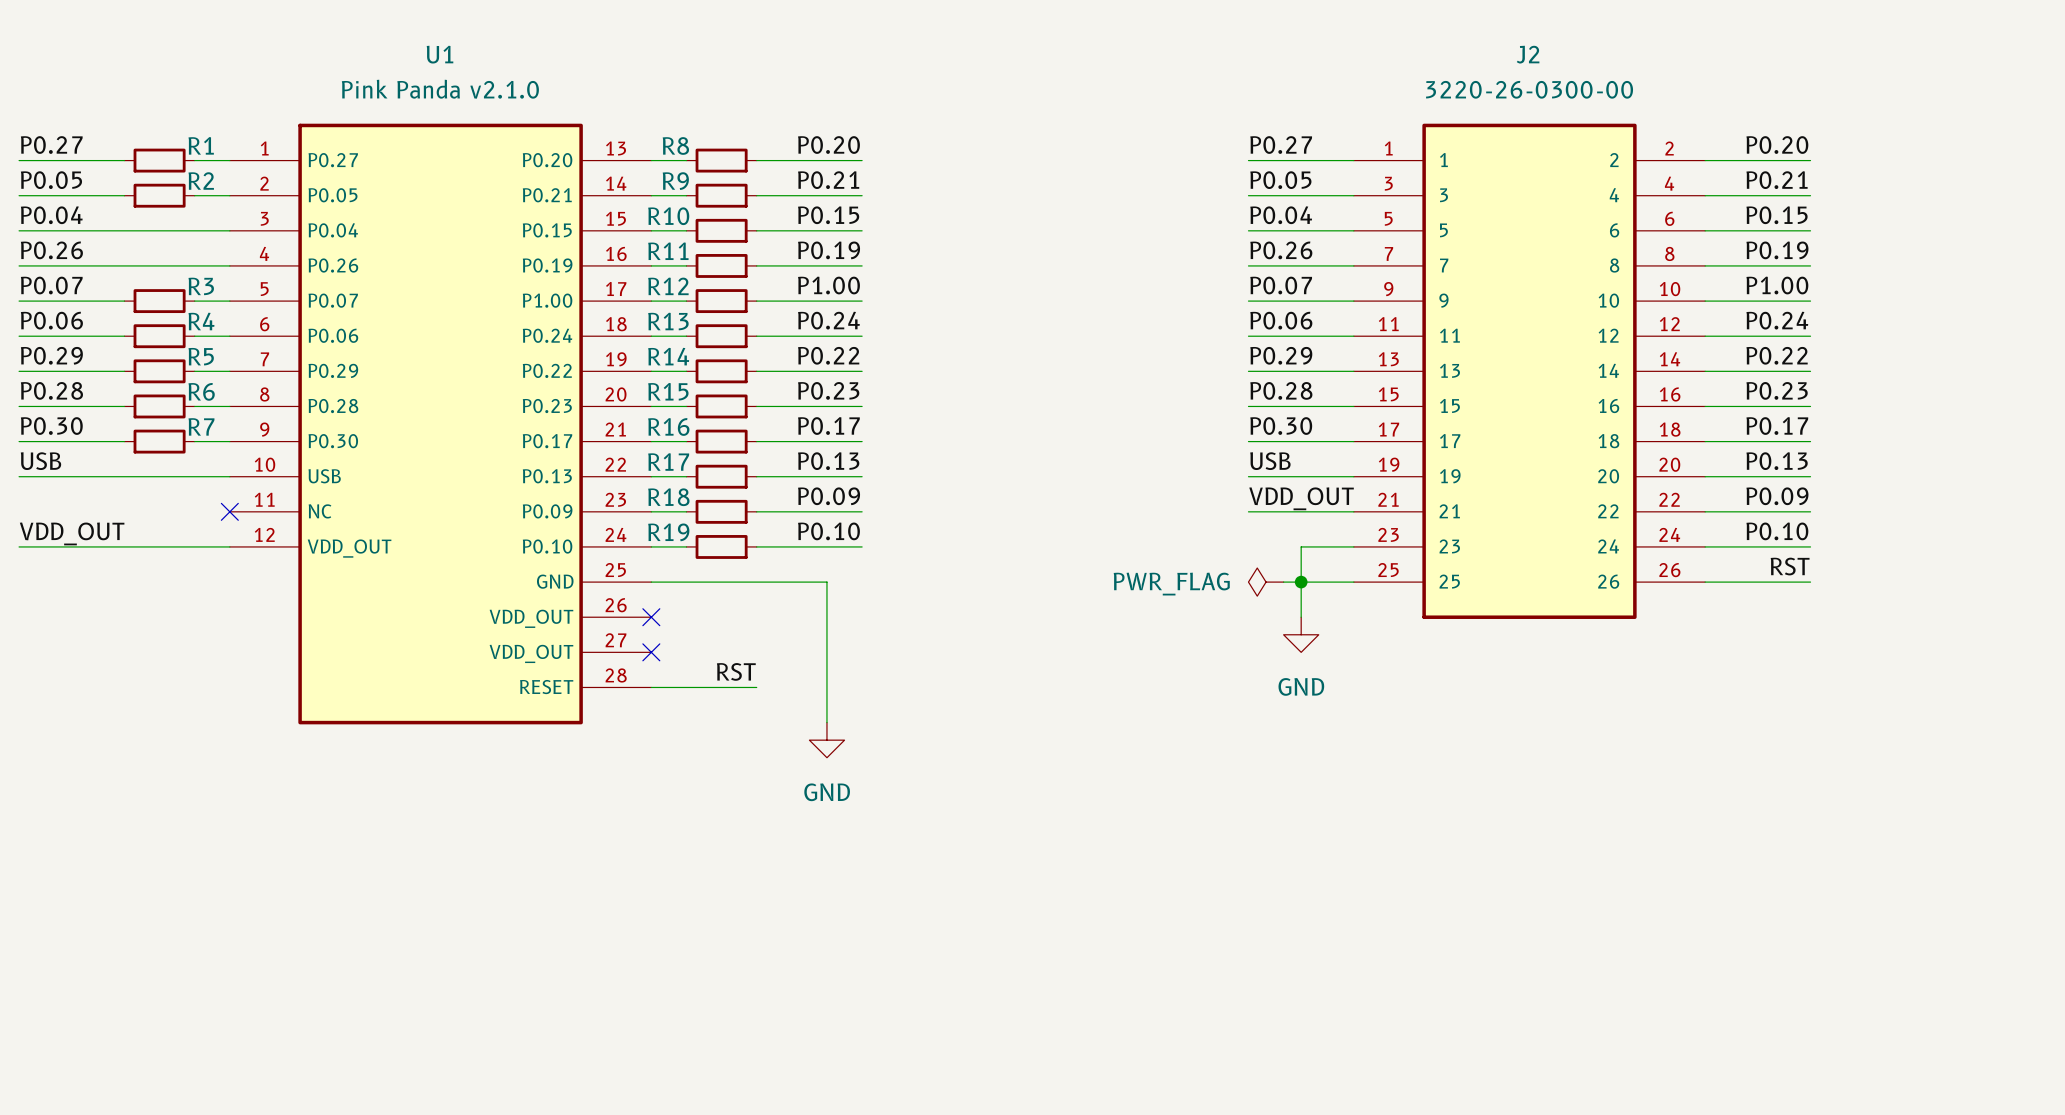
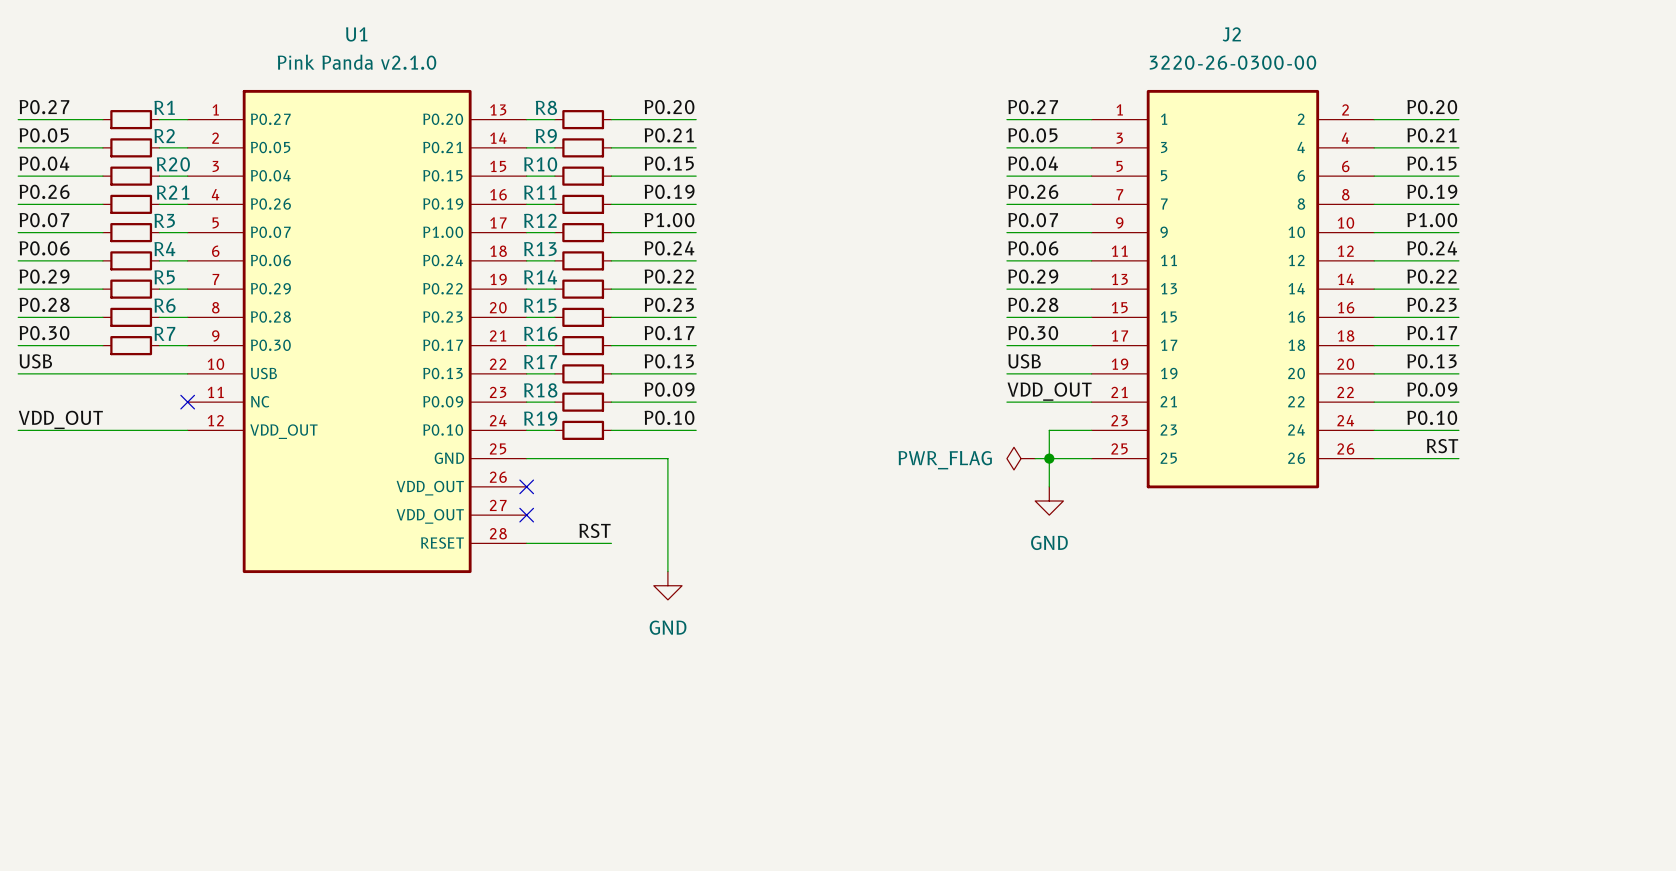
wire: (124, 230) (194, 230) -> none
R20: none -> (131, 176)
wire: (124, 265) (194, 265) -> none
R21: none -> (131, 204)

